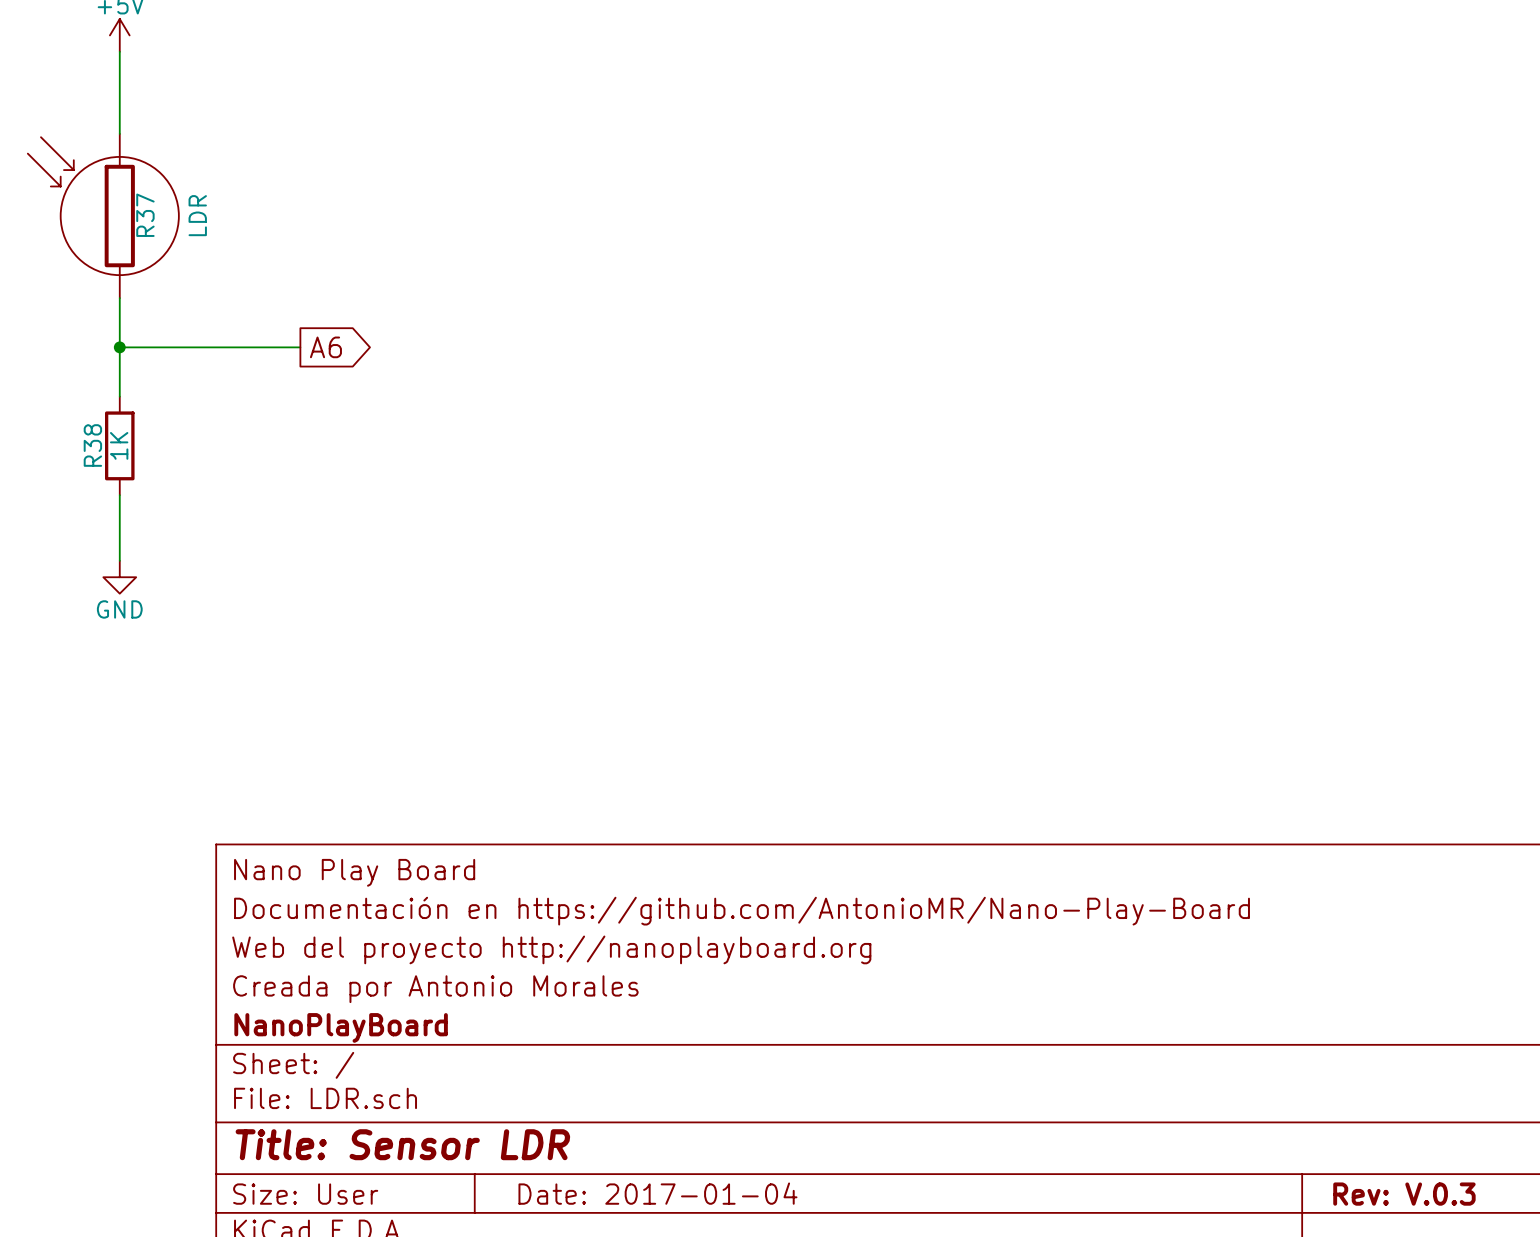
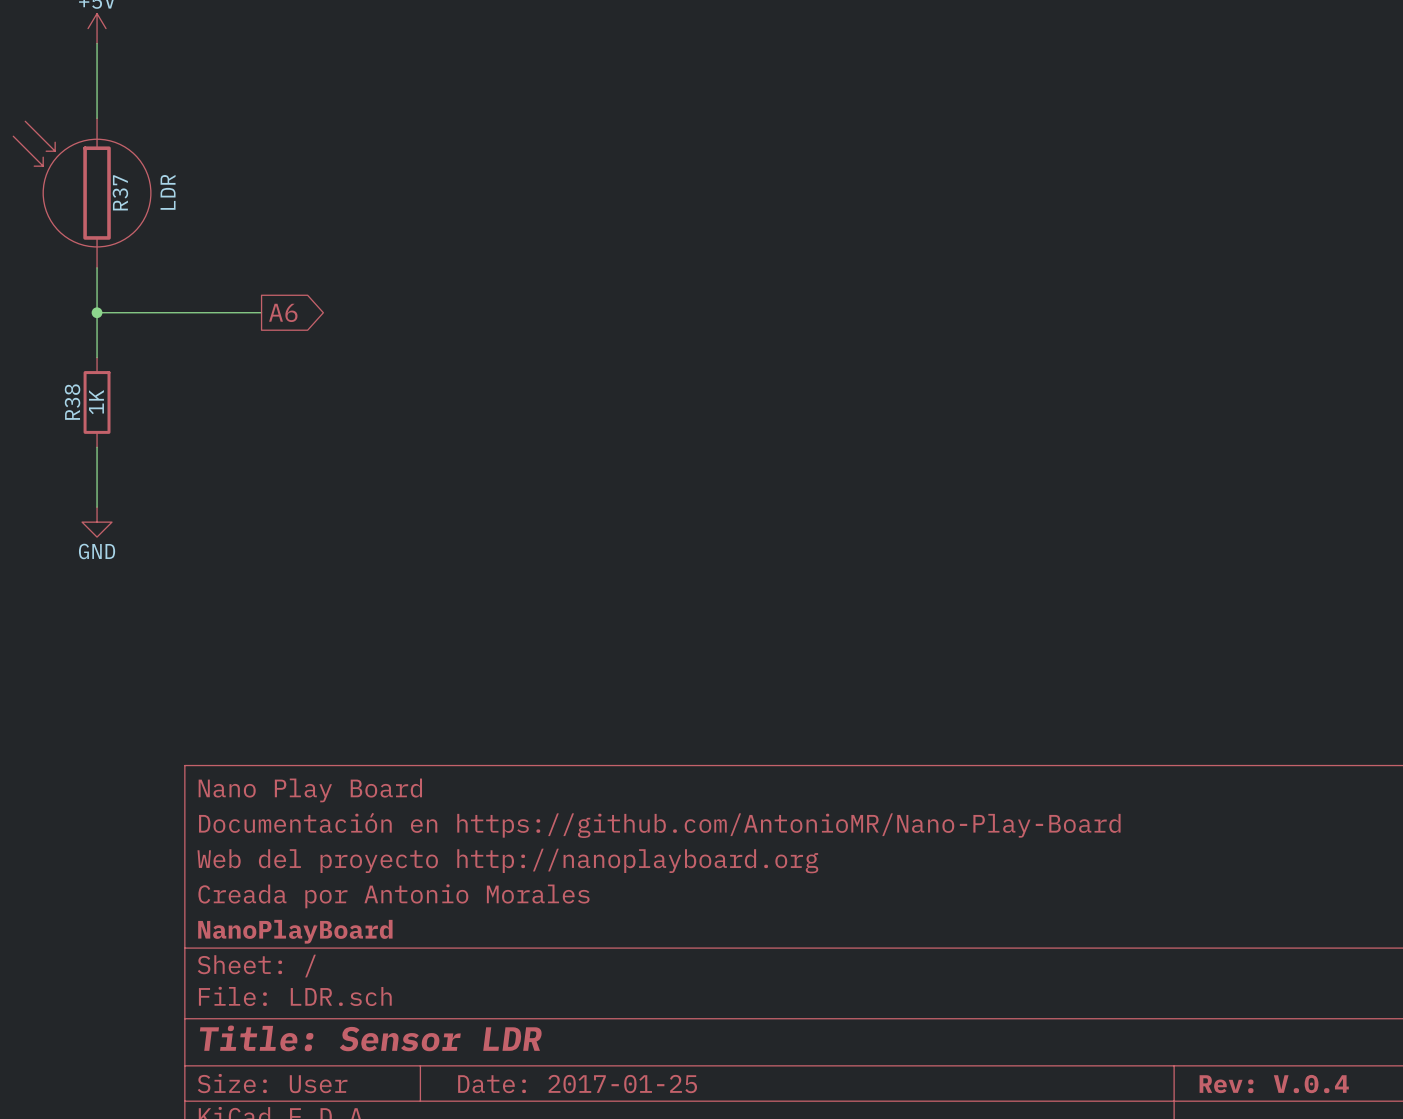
title block: Date: 2017-01-04 (657, 1193) -> Date: 2017-01-25 (577, 1084)
title block: Rev: V.0.3 (1404, 1194) -> Rev: V.0.4 (1274, 1084)

